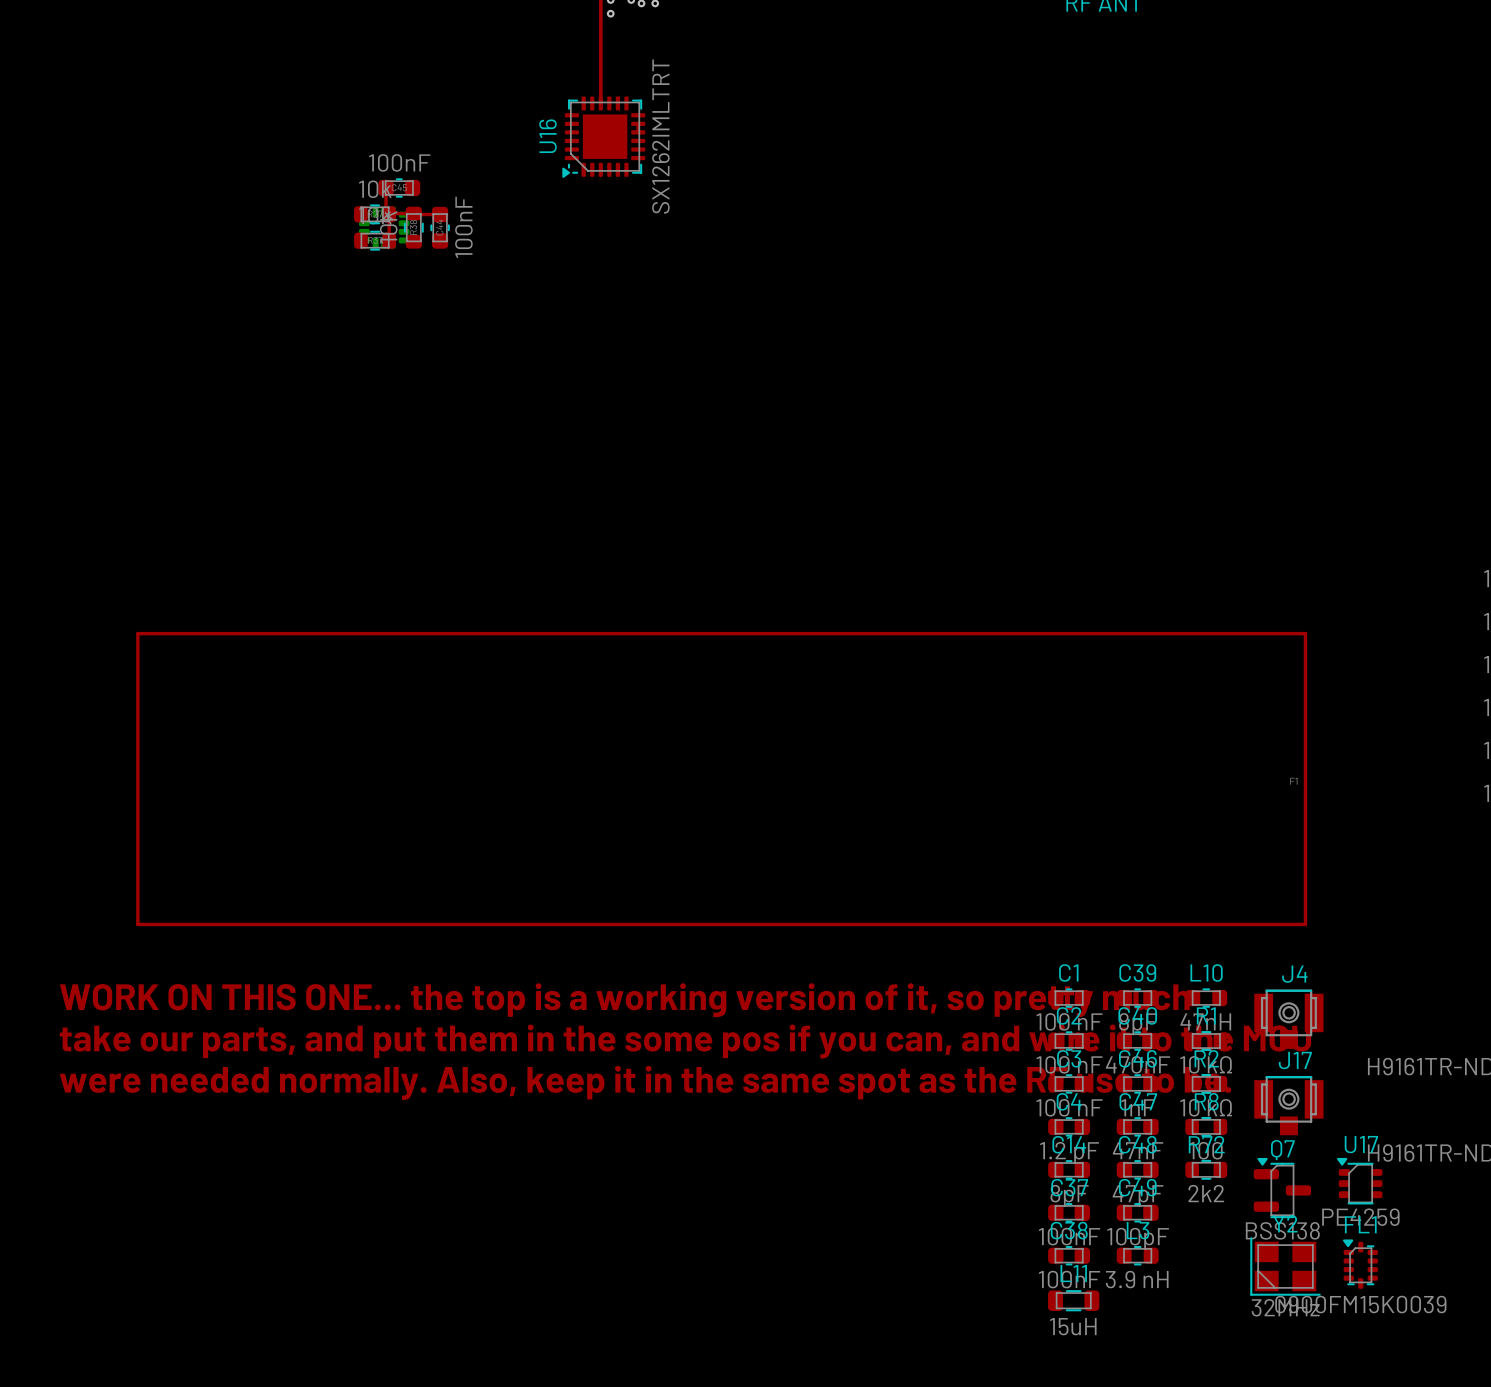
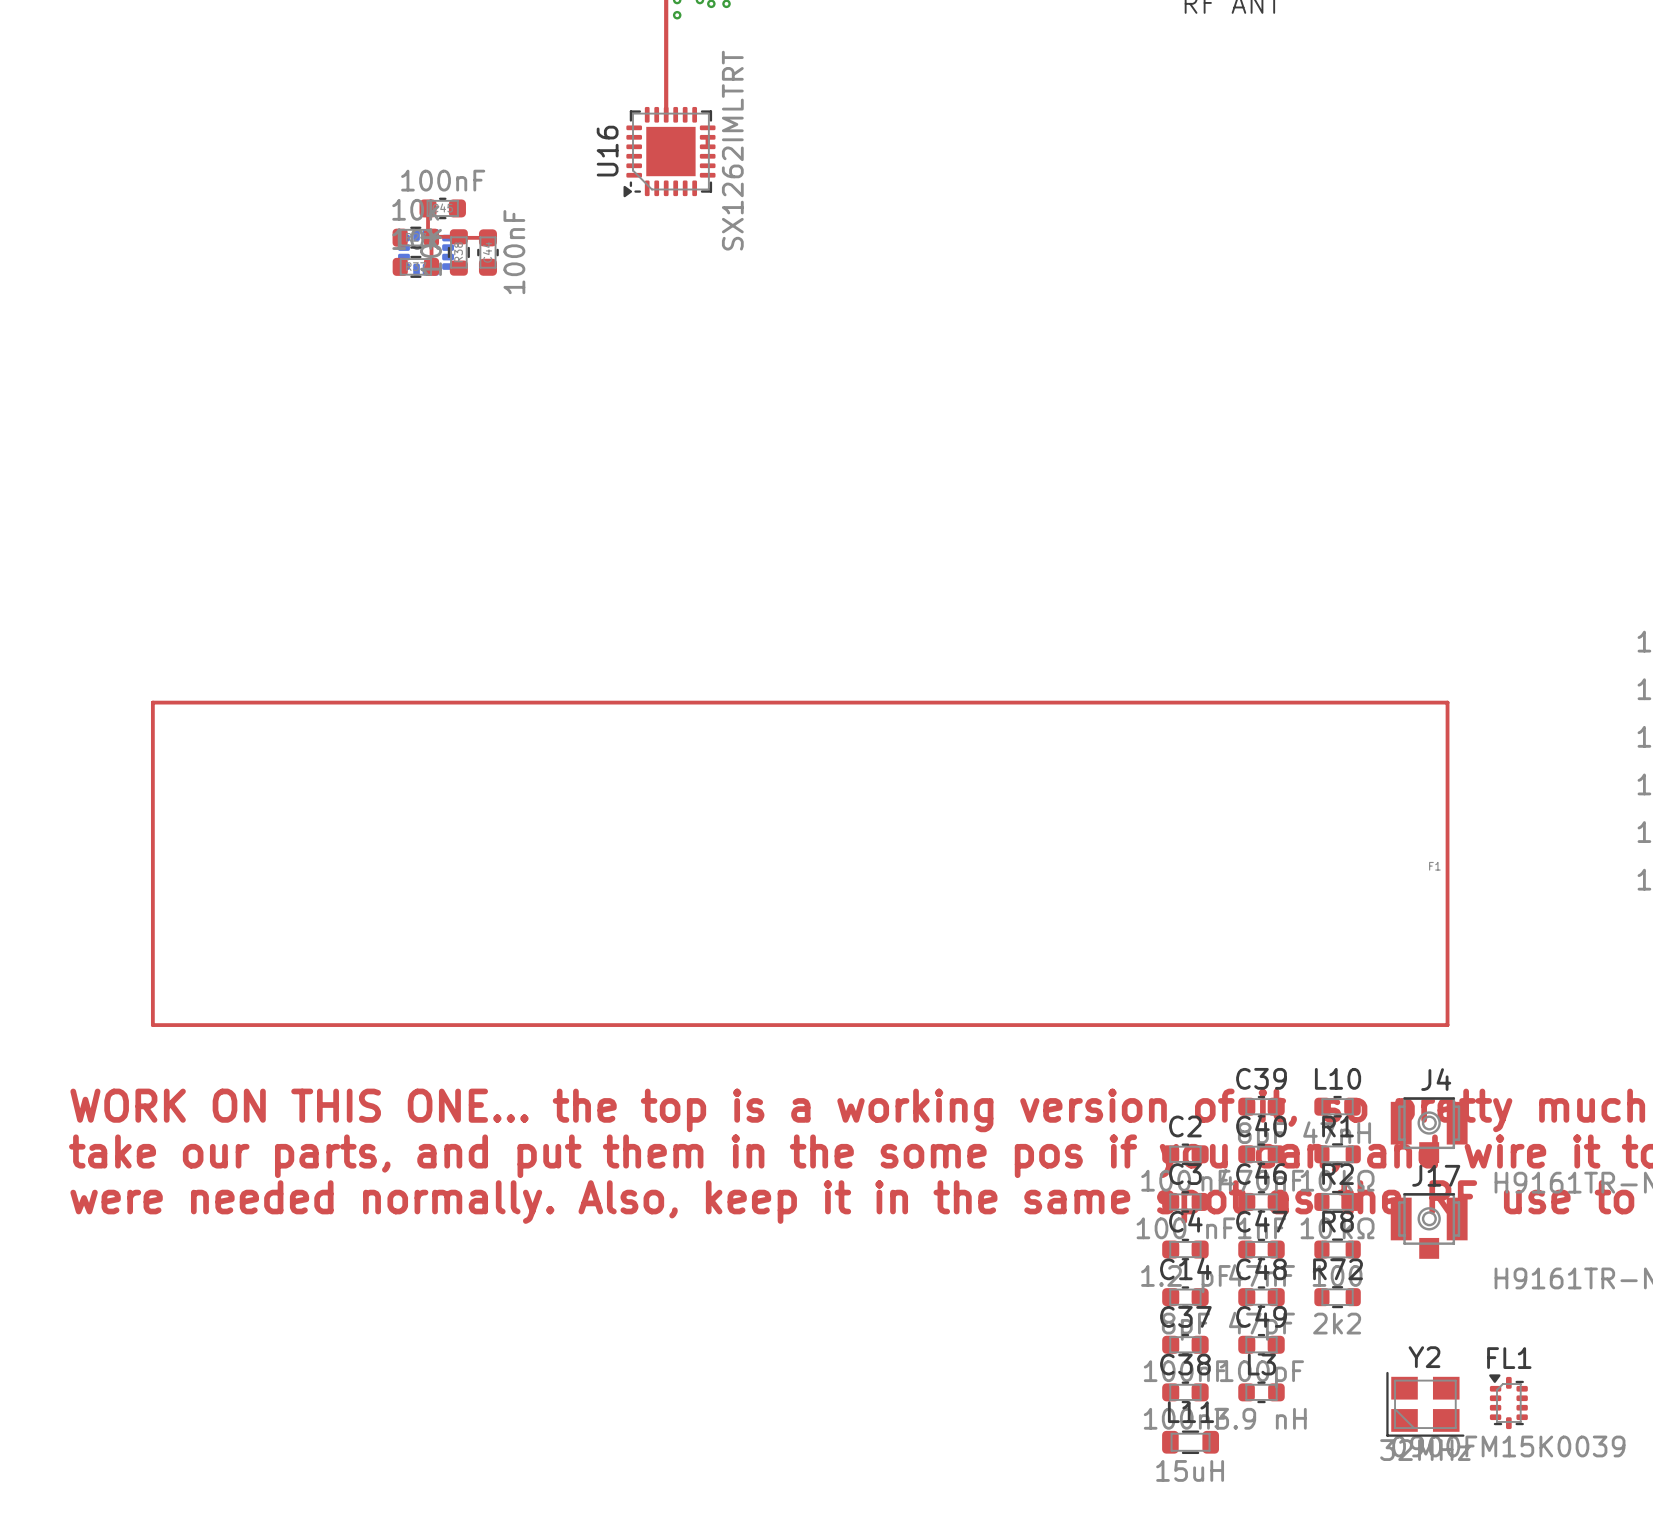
C1: 100 nF (1069, 998) -> none
U17: PE4259 (1359, 1181) -> none
Q7: BSS138 (1282, 1188) -> none

